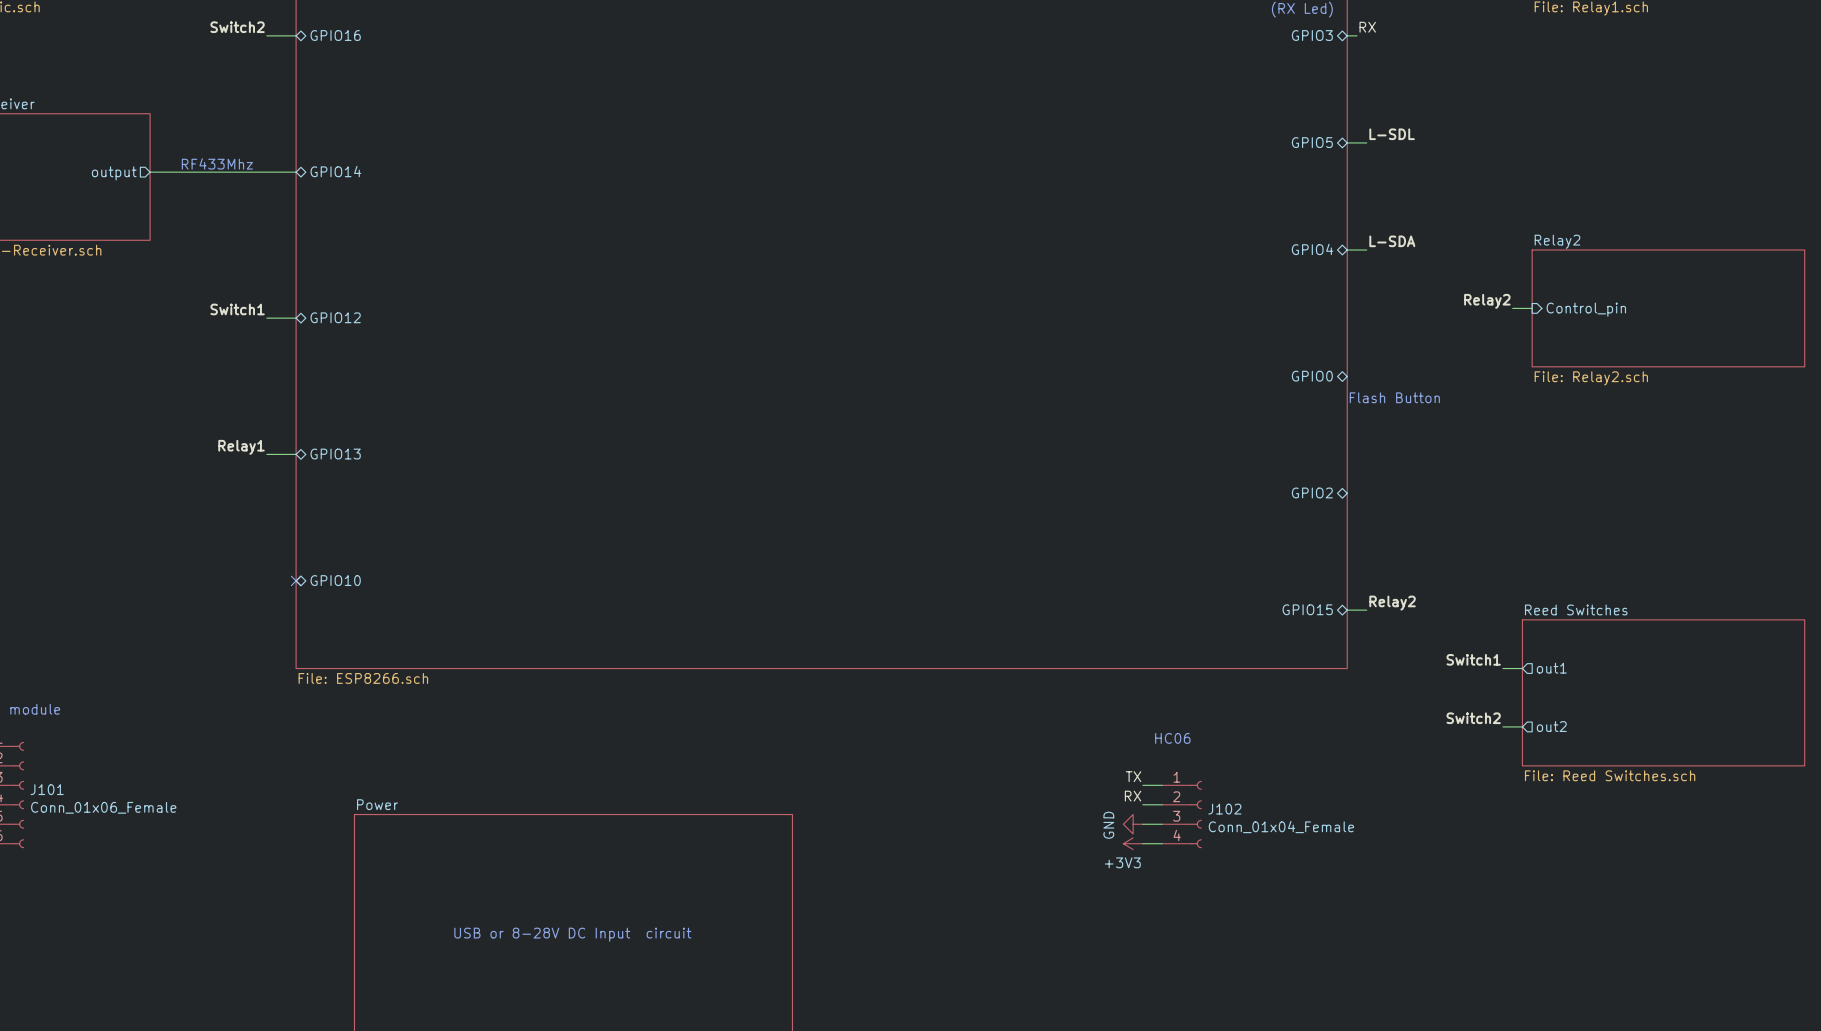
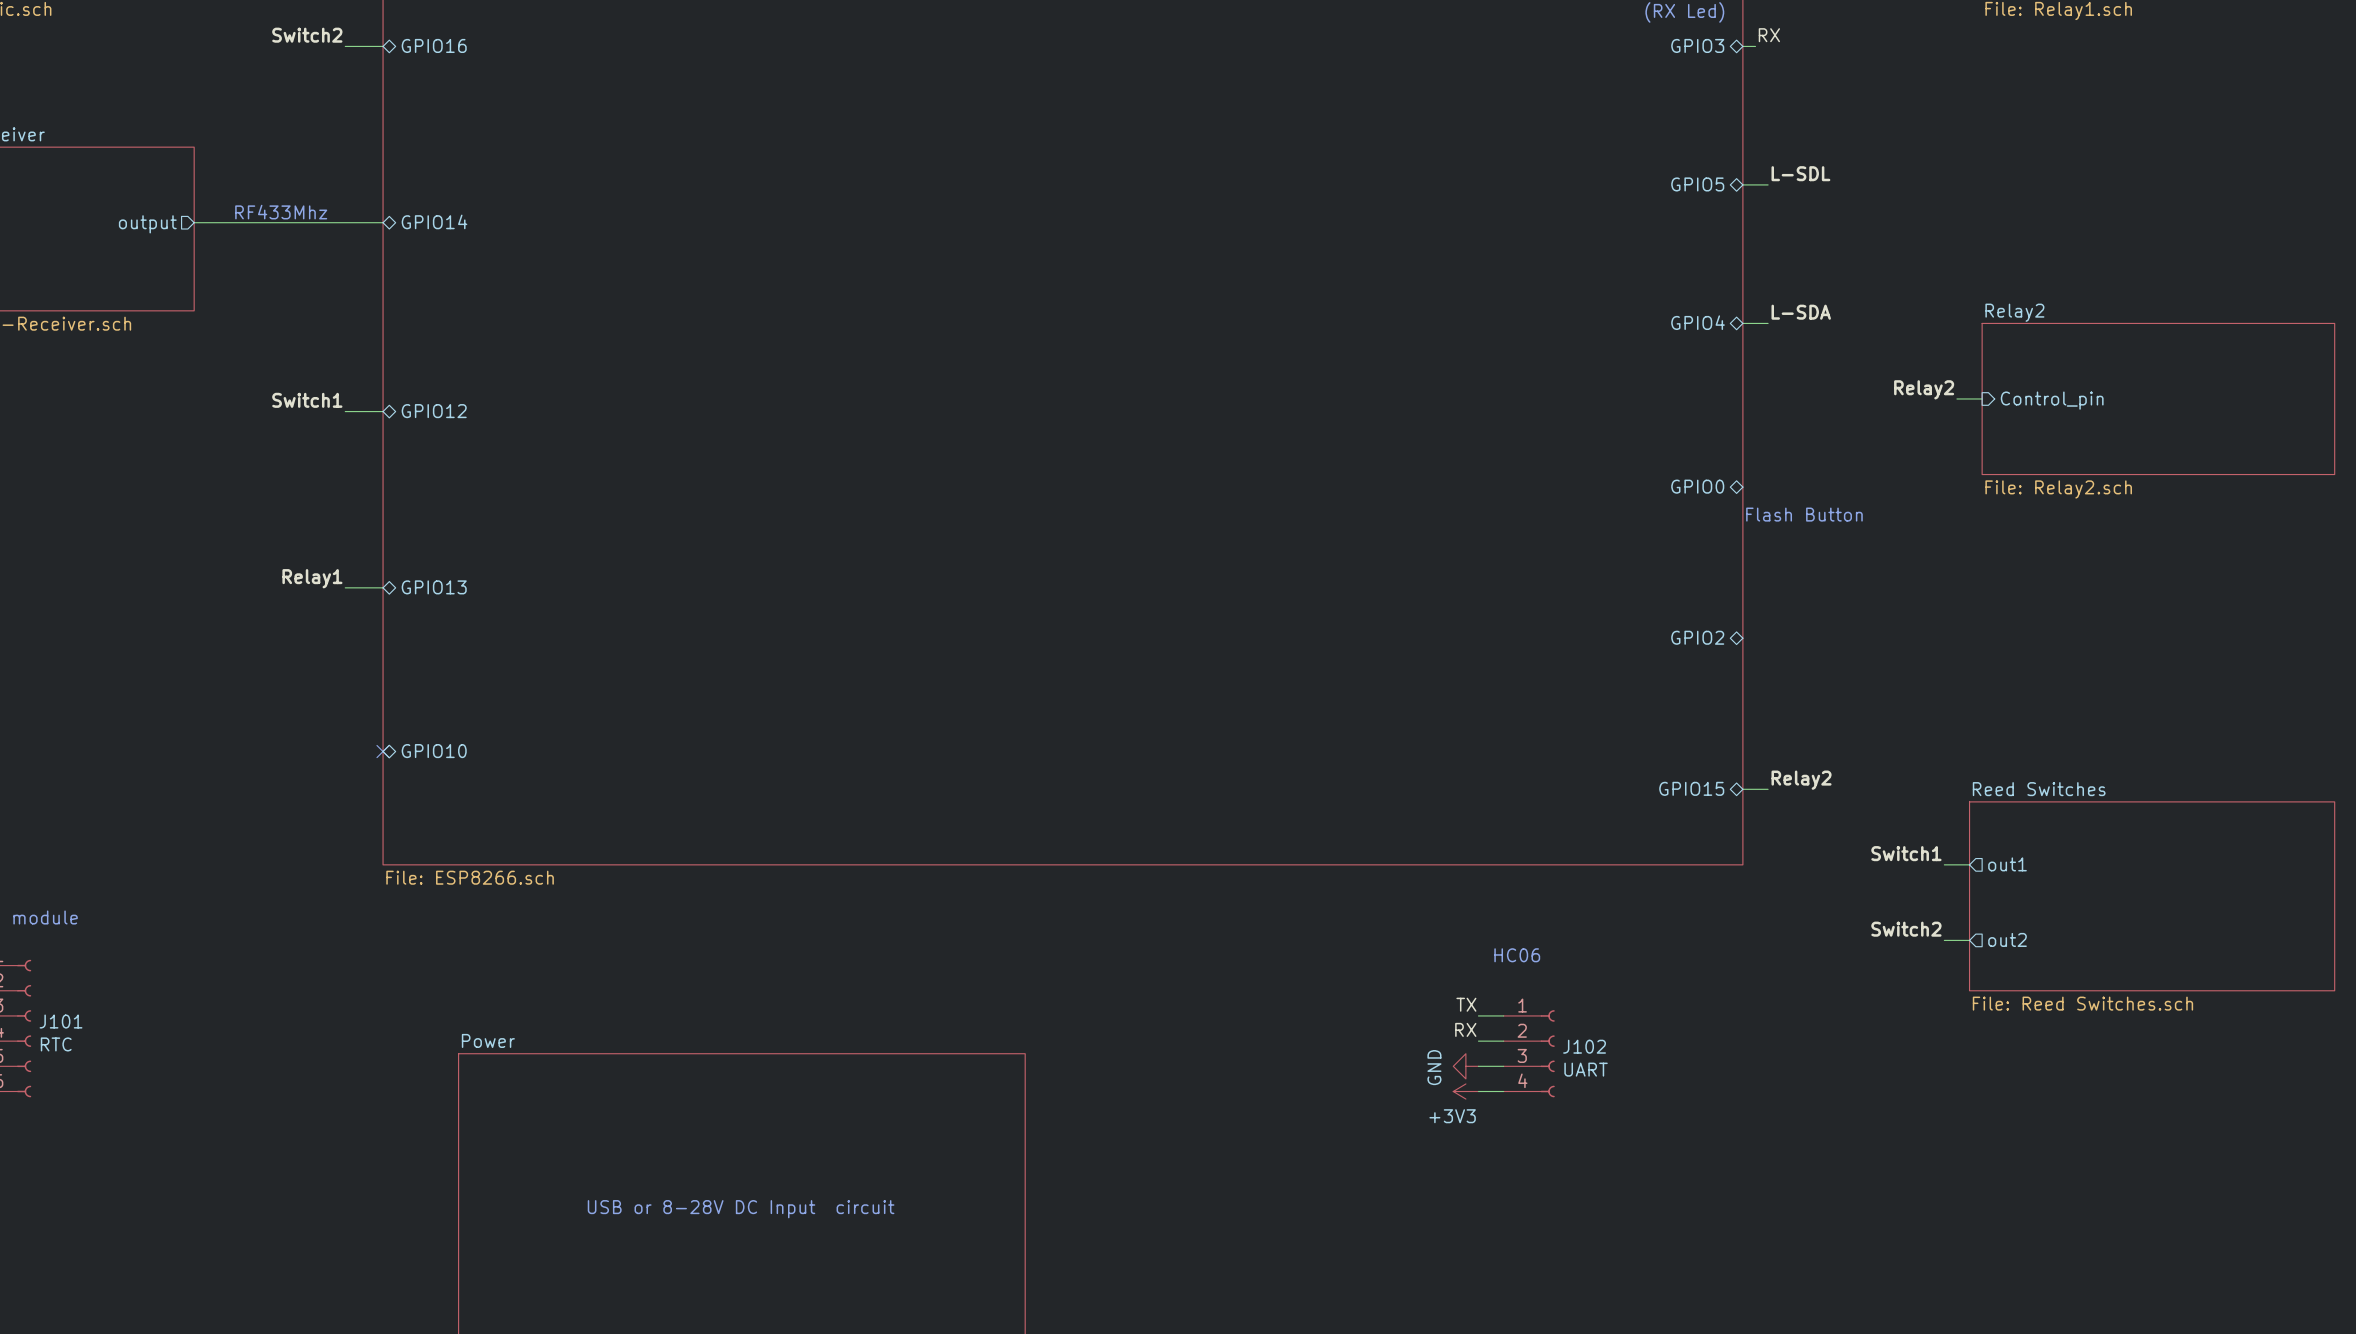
J101 value: Conn_01x06_Female (103, 807) -> RTC (56, 1044)
J102 value: Conn_01x04_Female (1281, 827) -> UART (1586, 1069)

